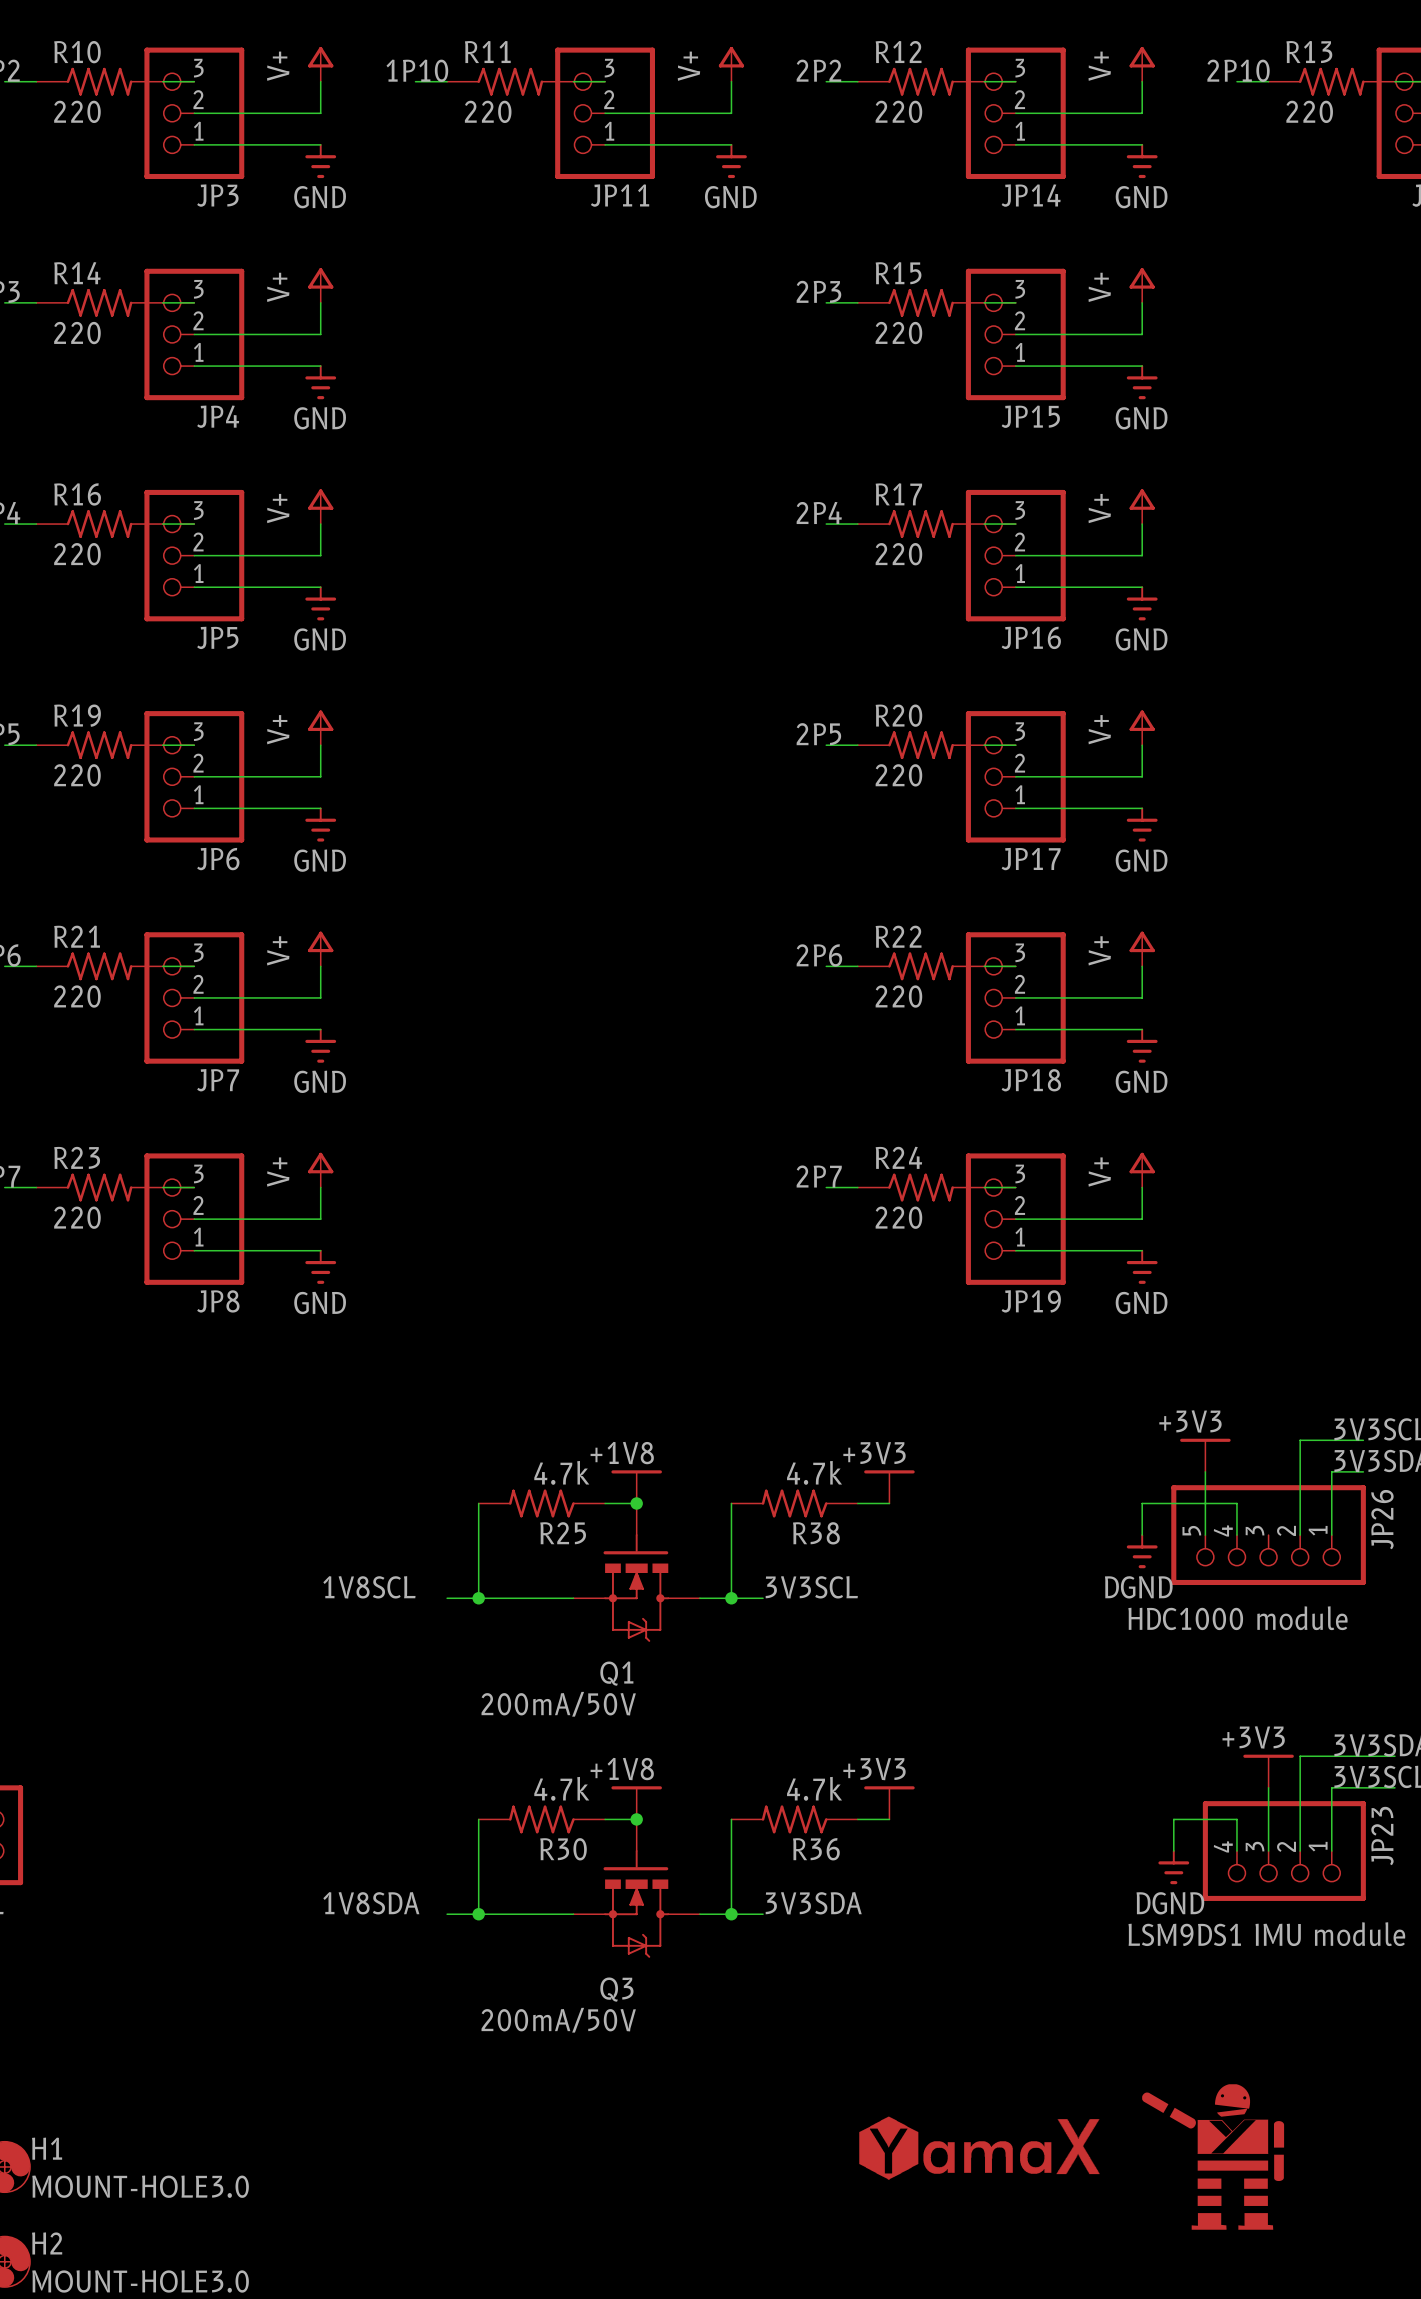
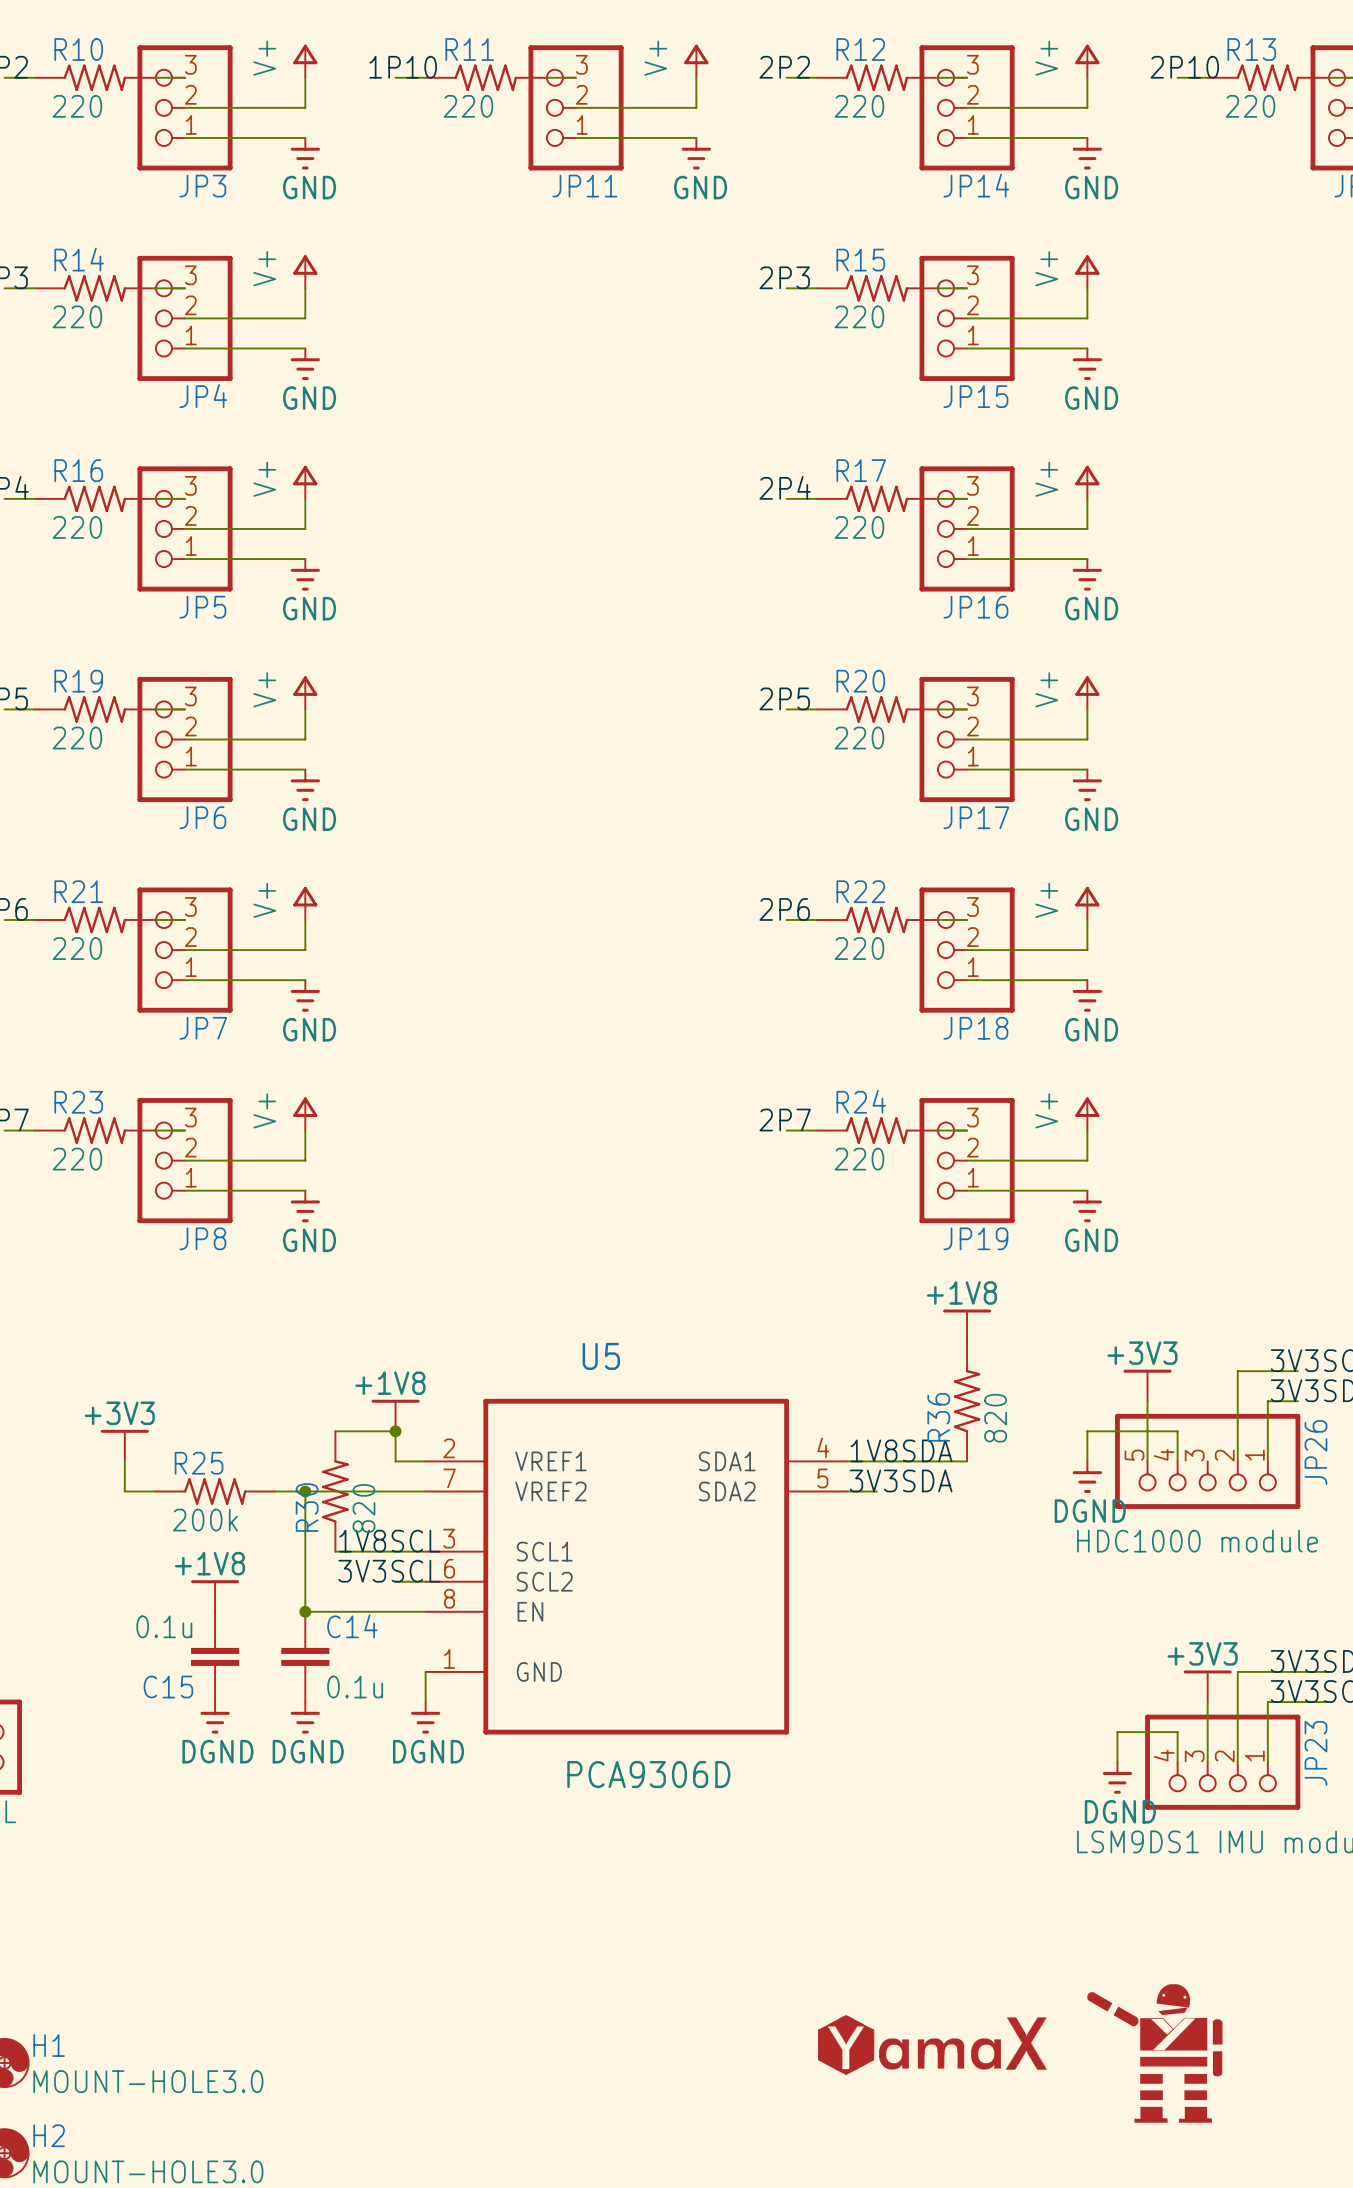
power symbol: none -> +1V8 (967, 1325)
R25 value: 4.7k (561, 1472) -> 200k (205, 1520)
power symbol: none -> +1V8 (395, 1415)
power symbol: +1V8 (636, 1486) -> none
power symbol: +3V3 (889, 1486) -> none
wire: none -> (335, 1431) (395, 1431) (395, 1461) (425, 1461)
junction: none -> (395, 1431)
wire: (478, 1503) (478, 1598) -> none
R25 rotation: 0° (541, 1503) -> 180° (215, 1491)
R25 position: (541, 1503) -> (215, 1491)
wire: (605, 1503) (636, 1503) -> (395, 1581) (425, 1581)
junction: (636, 1503) -> none
wire: (731, 1503) (731, 1598) -> none
R38: 4.7k (794, 1503) -> none
wire: (857, 1503) (889, 1503) -> (846, 1491) (876, 1491)
power symbol: none -> +3V3 (124, 1445)
label: none -> 1V8SDA (901, 1450)
wire: none -> (124, 1461) (124, 1491) (154, 1491)
wire: none -> (846, 1461) (967, 1461)
wire: none -> (275, 1491) (425, 1491)
wire: none -> (305, 1491) (305, 1611) (425, 1611)
junction: none -> (305, 1491)
Q1: 200mA/50V (636, 1572) -> none
label position: 1V8SCL (369, 1587) -> 1V8SCL (389, 1541)
label: 3V3SCL (811, 1587) -> 3V3SDA (901, 1480)
wire: (447, 1598) (573, 1598) -> none
junction: (478, 1598) -> none
wire: (699, 1598) (763, 1598) -> none
junction: (731, 1598) -> none
wire: none -> (335, 1551) (425, 1551)
U5: none -> PCA9306D (636, 1566)
label: none -> 3V3SCL (389, 1571)
power symbol: none -> +1V8 (215, 1596)
junction: none -> (305, 1611)
C15: none -> 0.1u (215, 1656)
C14: none -> 0.1u (305, 1656)
wire: none -> (425, 1671) (425, 1702)
R30 value: 4.7k (561, 1788) -> 820 (363, 1508)
R36 value: 4.7k (814, 1788) -> 820 (995, 1418)
power symbol: +1V8 (636, 1802) -> none
power symbol: +3V3 (889, 1802) -> none
power symbol: none -> DGND (215, 1717)
power symbol: none -> DGND (305, 1717)
power symbol: none -> DGND (425, 1717)
wire: (478, 1819) (478, 1914) -> none
R30 rotation: 0° (541, 1819) -> 90° clockwise (335, 1491)
R30 position: (541, 1819) -> (335, 1491)
junction: (636, 1819) -> none
wire: (731, 1819) (731, 1914) -> none
R36 rotation: 0° (794, 1819) -> 90° clockwise (967, 1401)
R36 position: (794, 1819) -> (967, 1401)
wire: (857, 1819) (889, 1819) -> none
Q3: 200mA/50V (636, 1888) -> none
label: 1V8SDA (371, 1903) -> none
label: 3V3SDA (813, 1903) -> none
wire: (447, 1914) (573, 1914) -> none
junction: (478, 1914) -> none
wire: (699, 1914) (763, 1914) -> none
junction: (731, 1914) -> none

